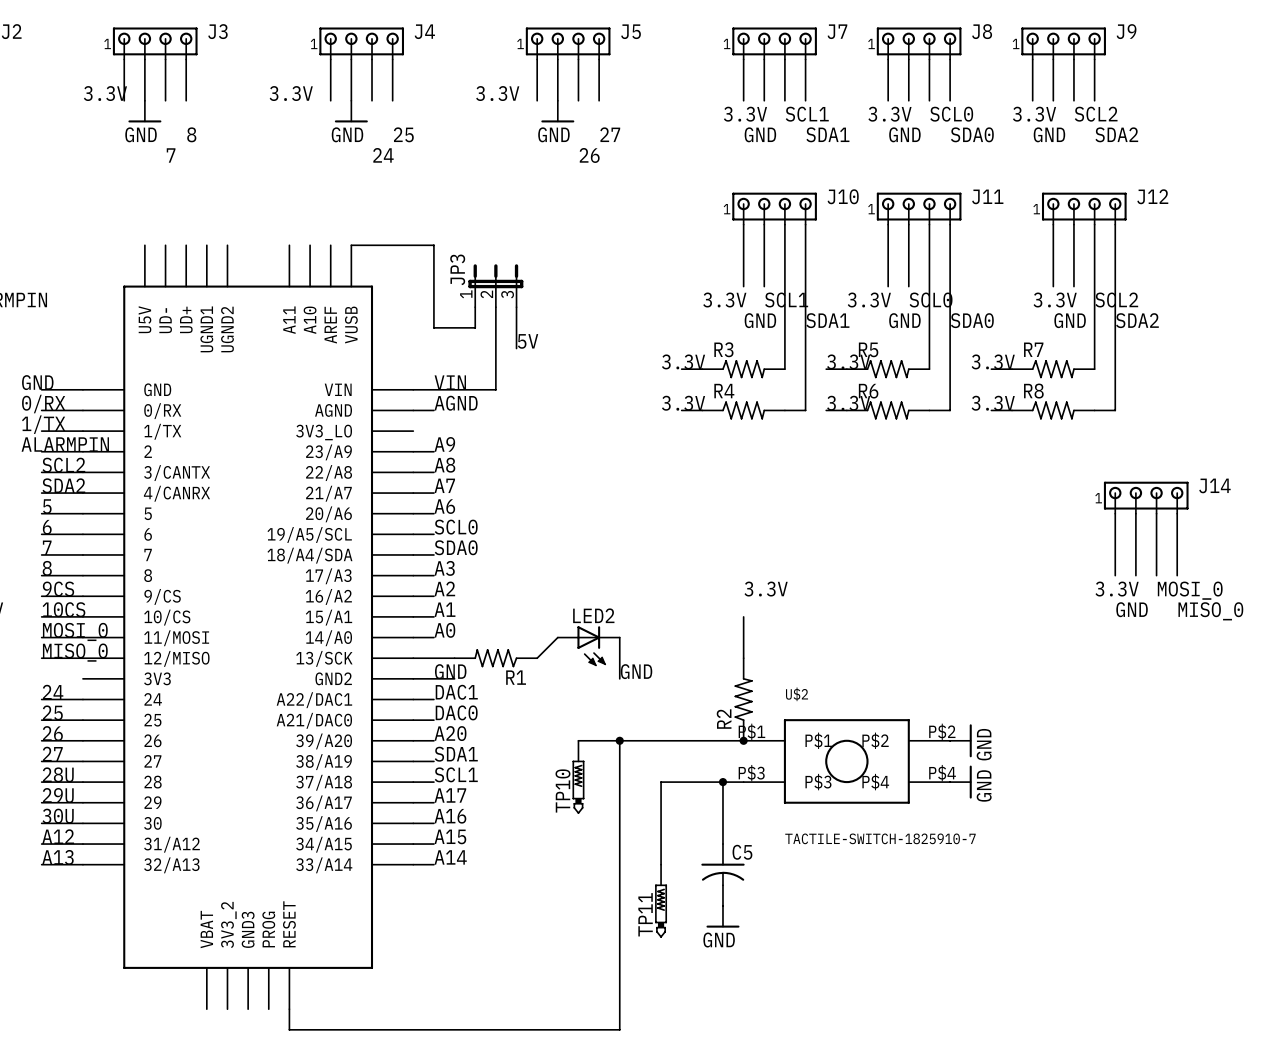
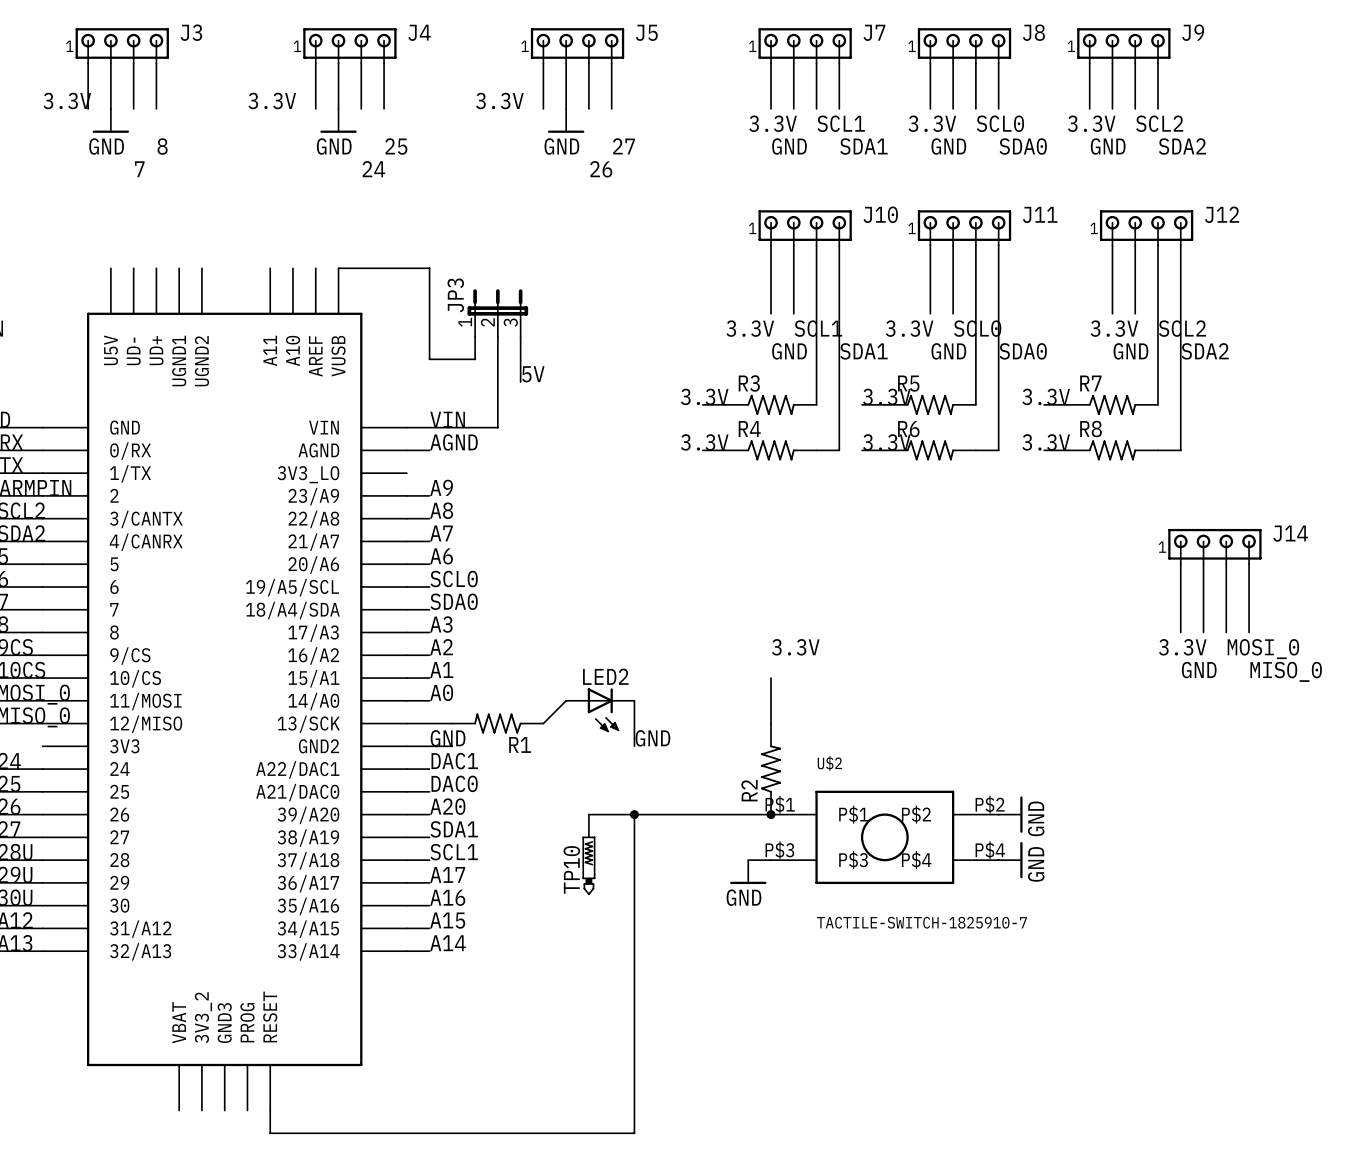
junction: (722, 782) -> none
wire: (722, 844) (722, 782) (661, 782) (661, 864) -> none
C5: (722, 874) -> none
TP11: (661, 901) -> none
power symbol position: GND (722, 916) -> GND (748, 872)

